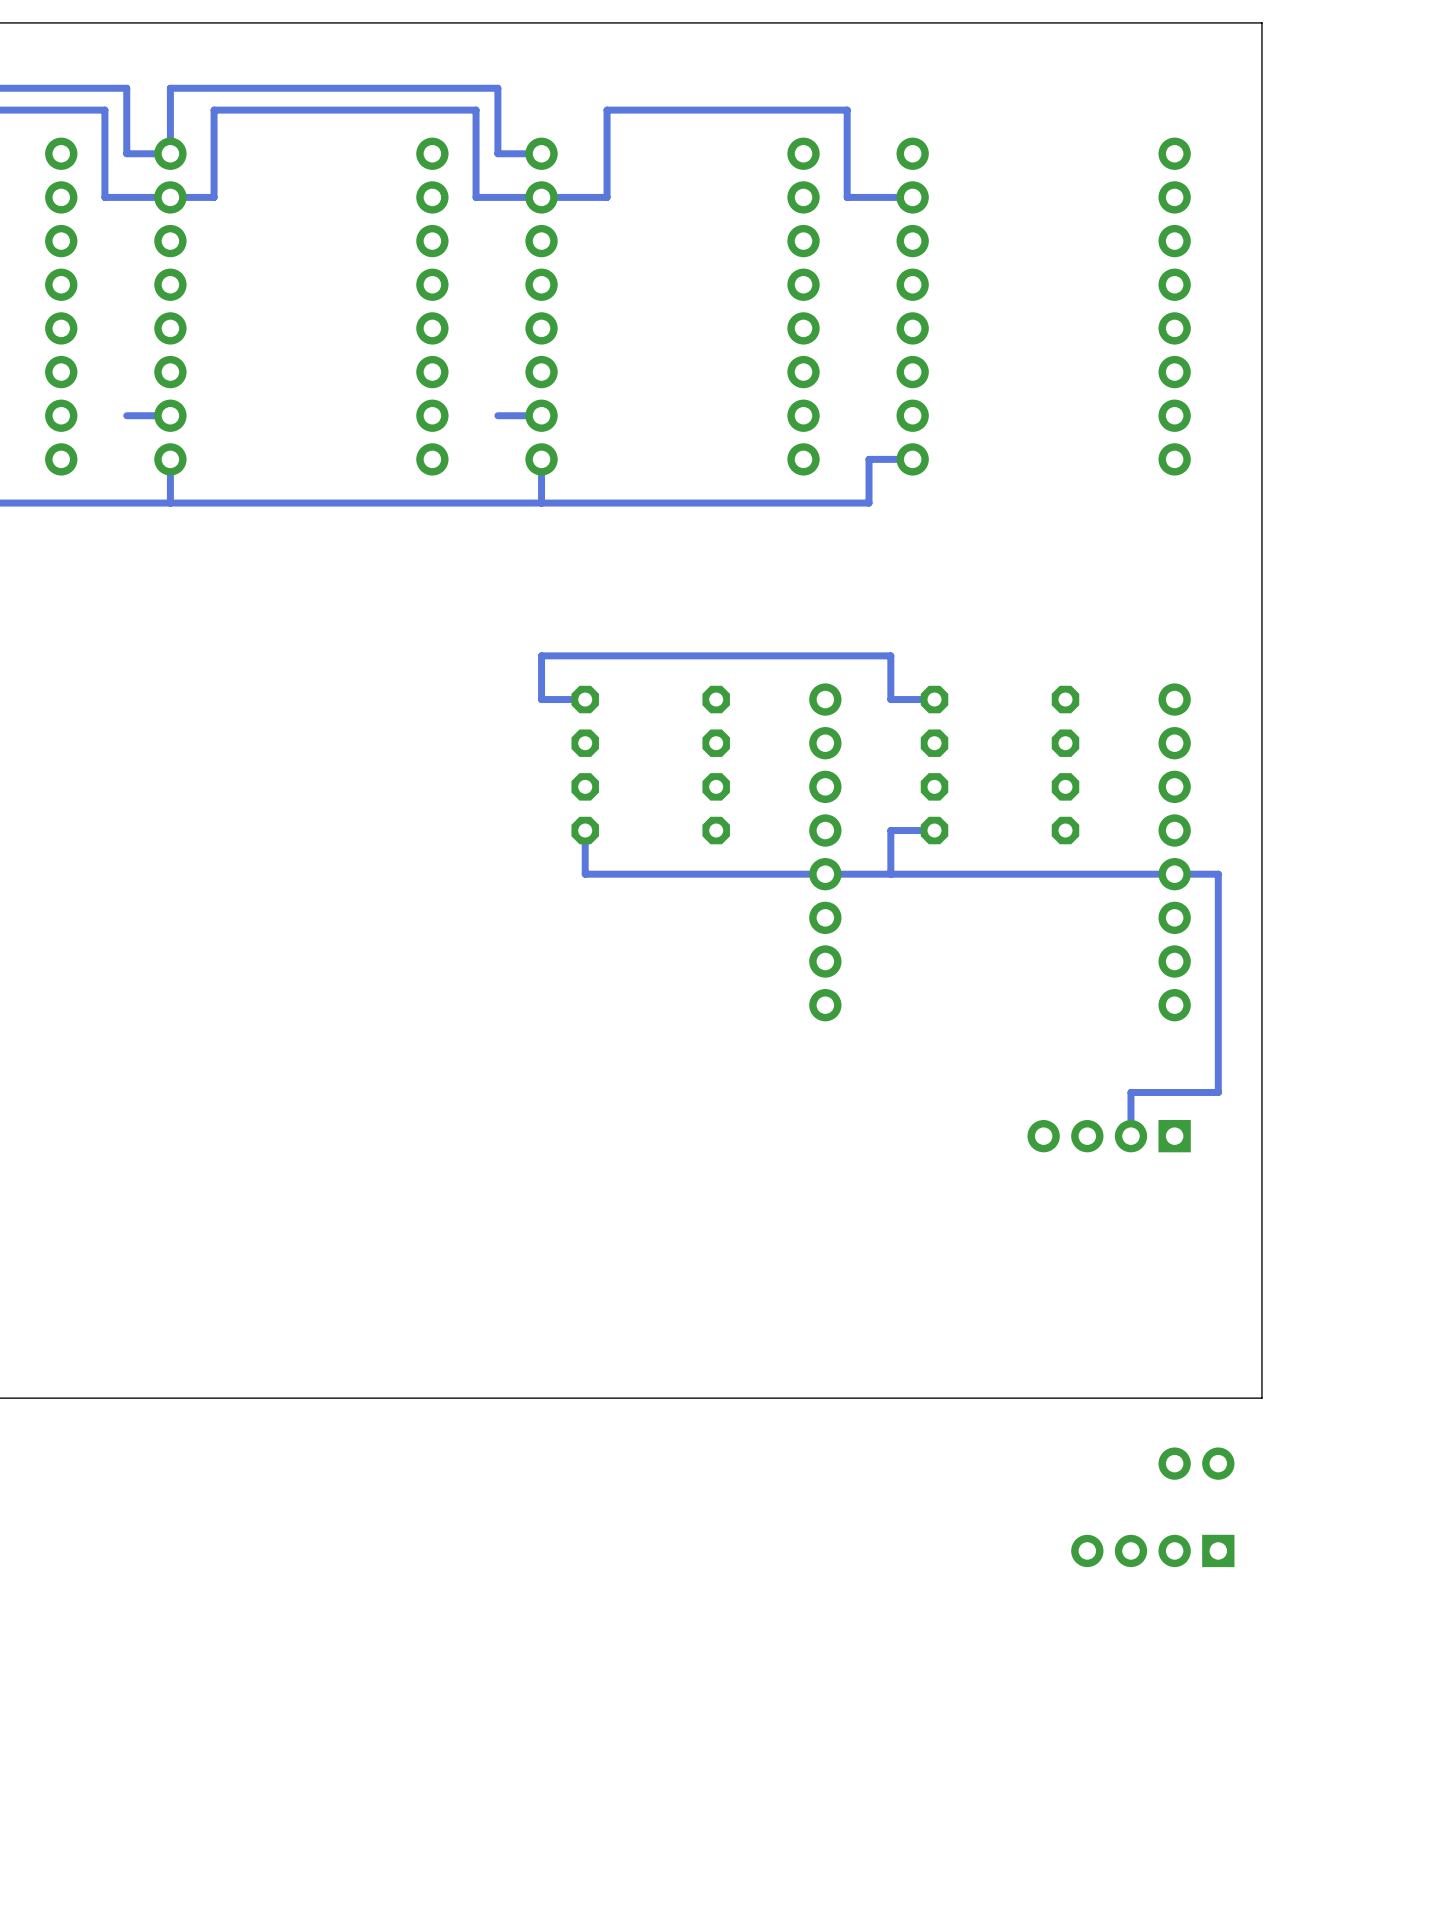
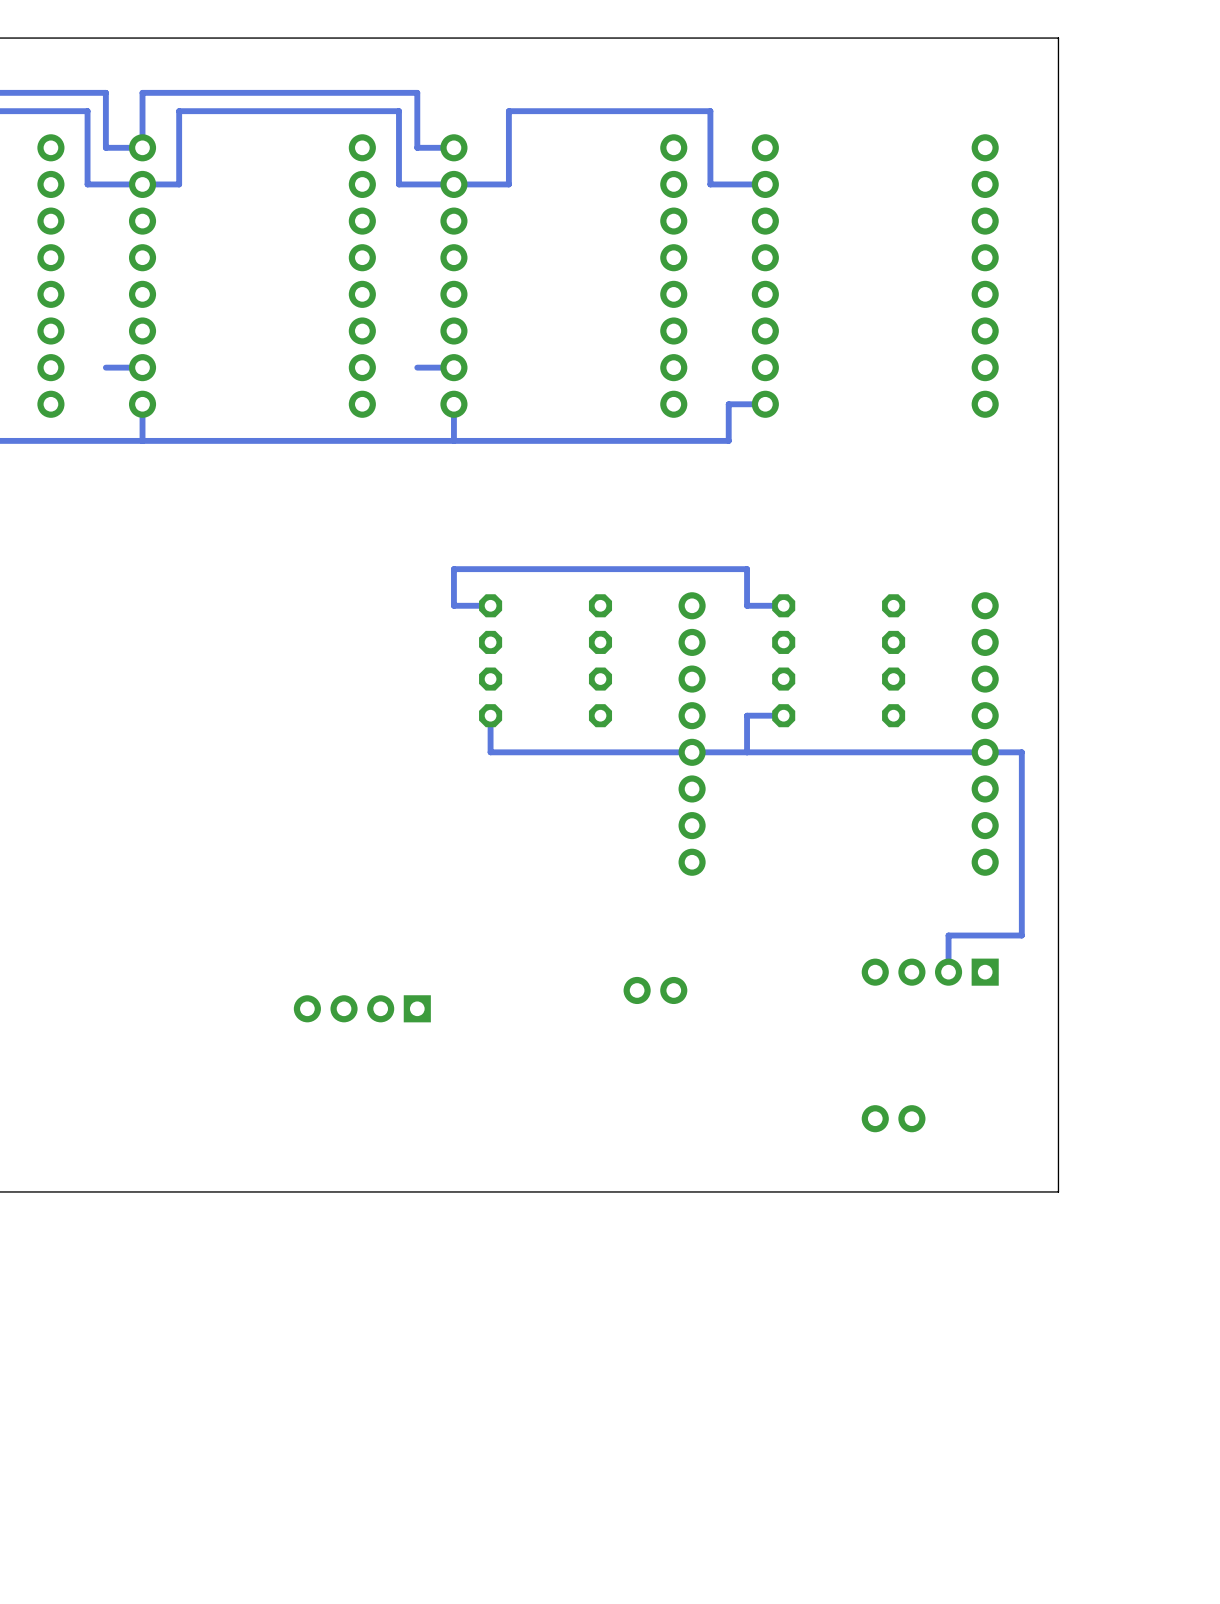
part: none -> (655, 990)
part: none -> (362, 1008)
part position: (1196, 1463) -> (893, 1118)
part: (1152, 1550) -> none

